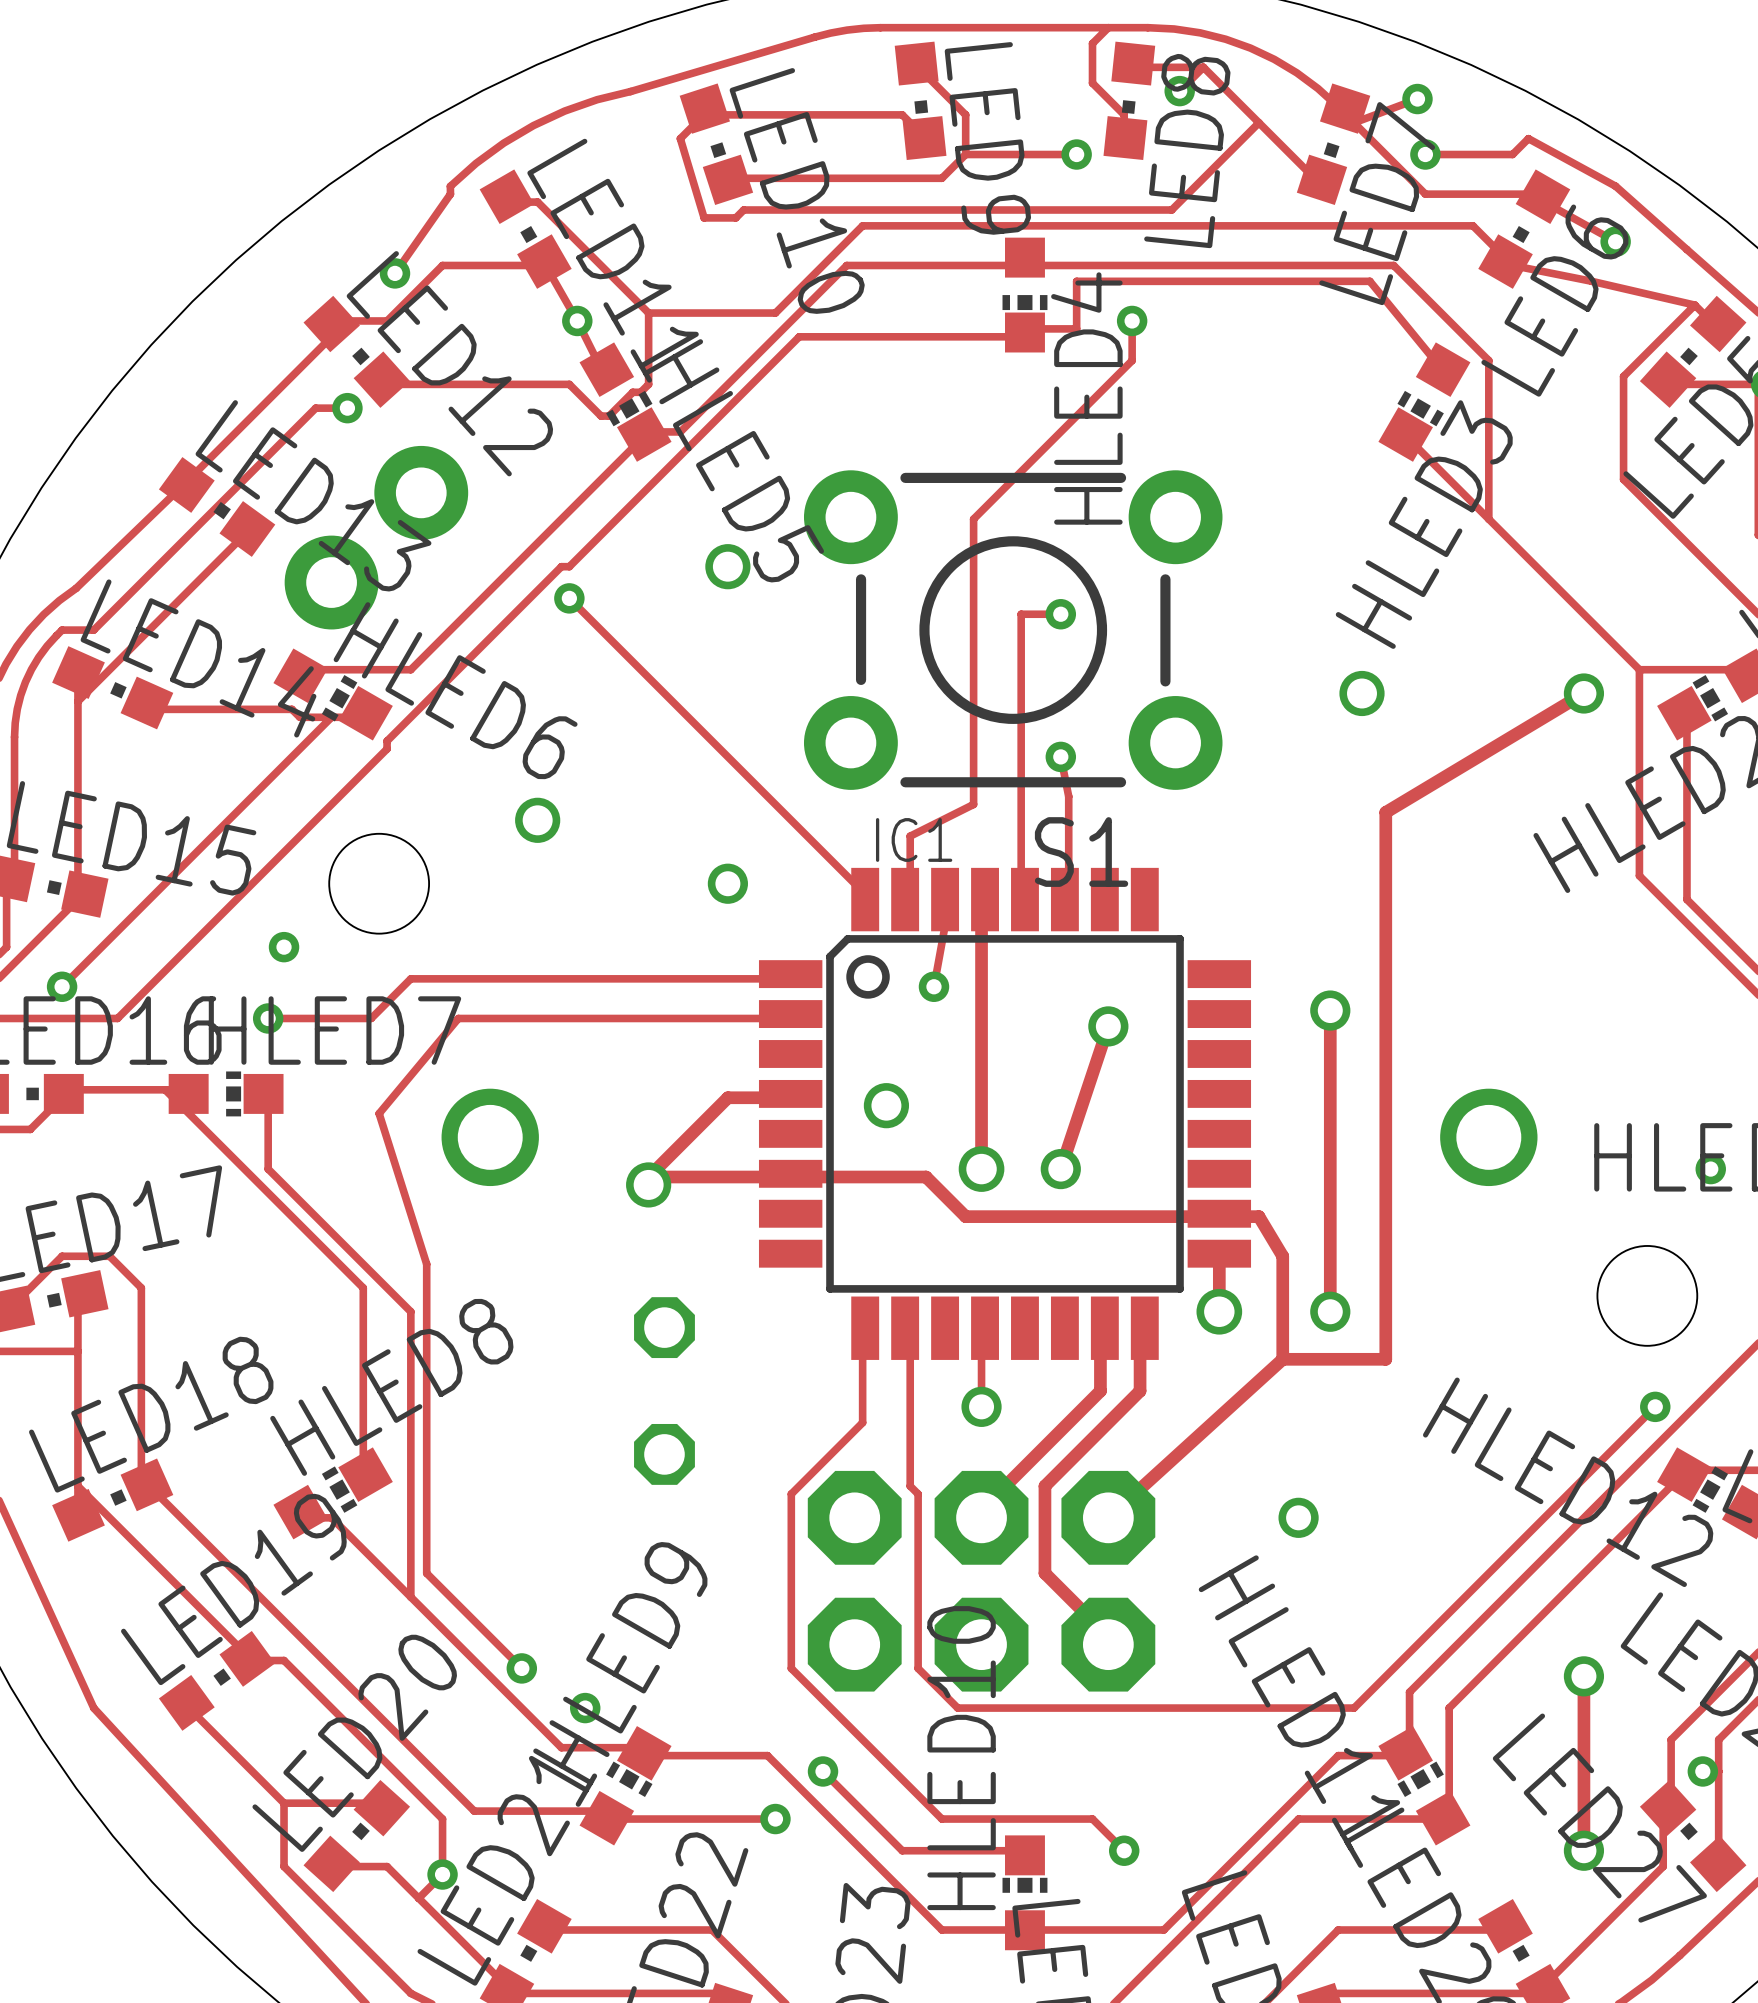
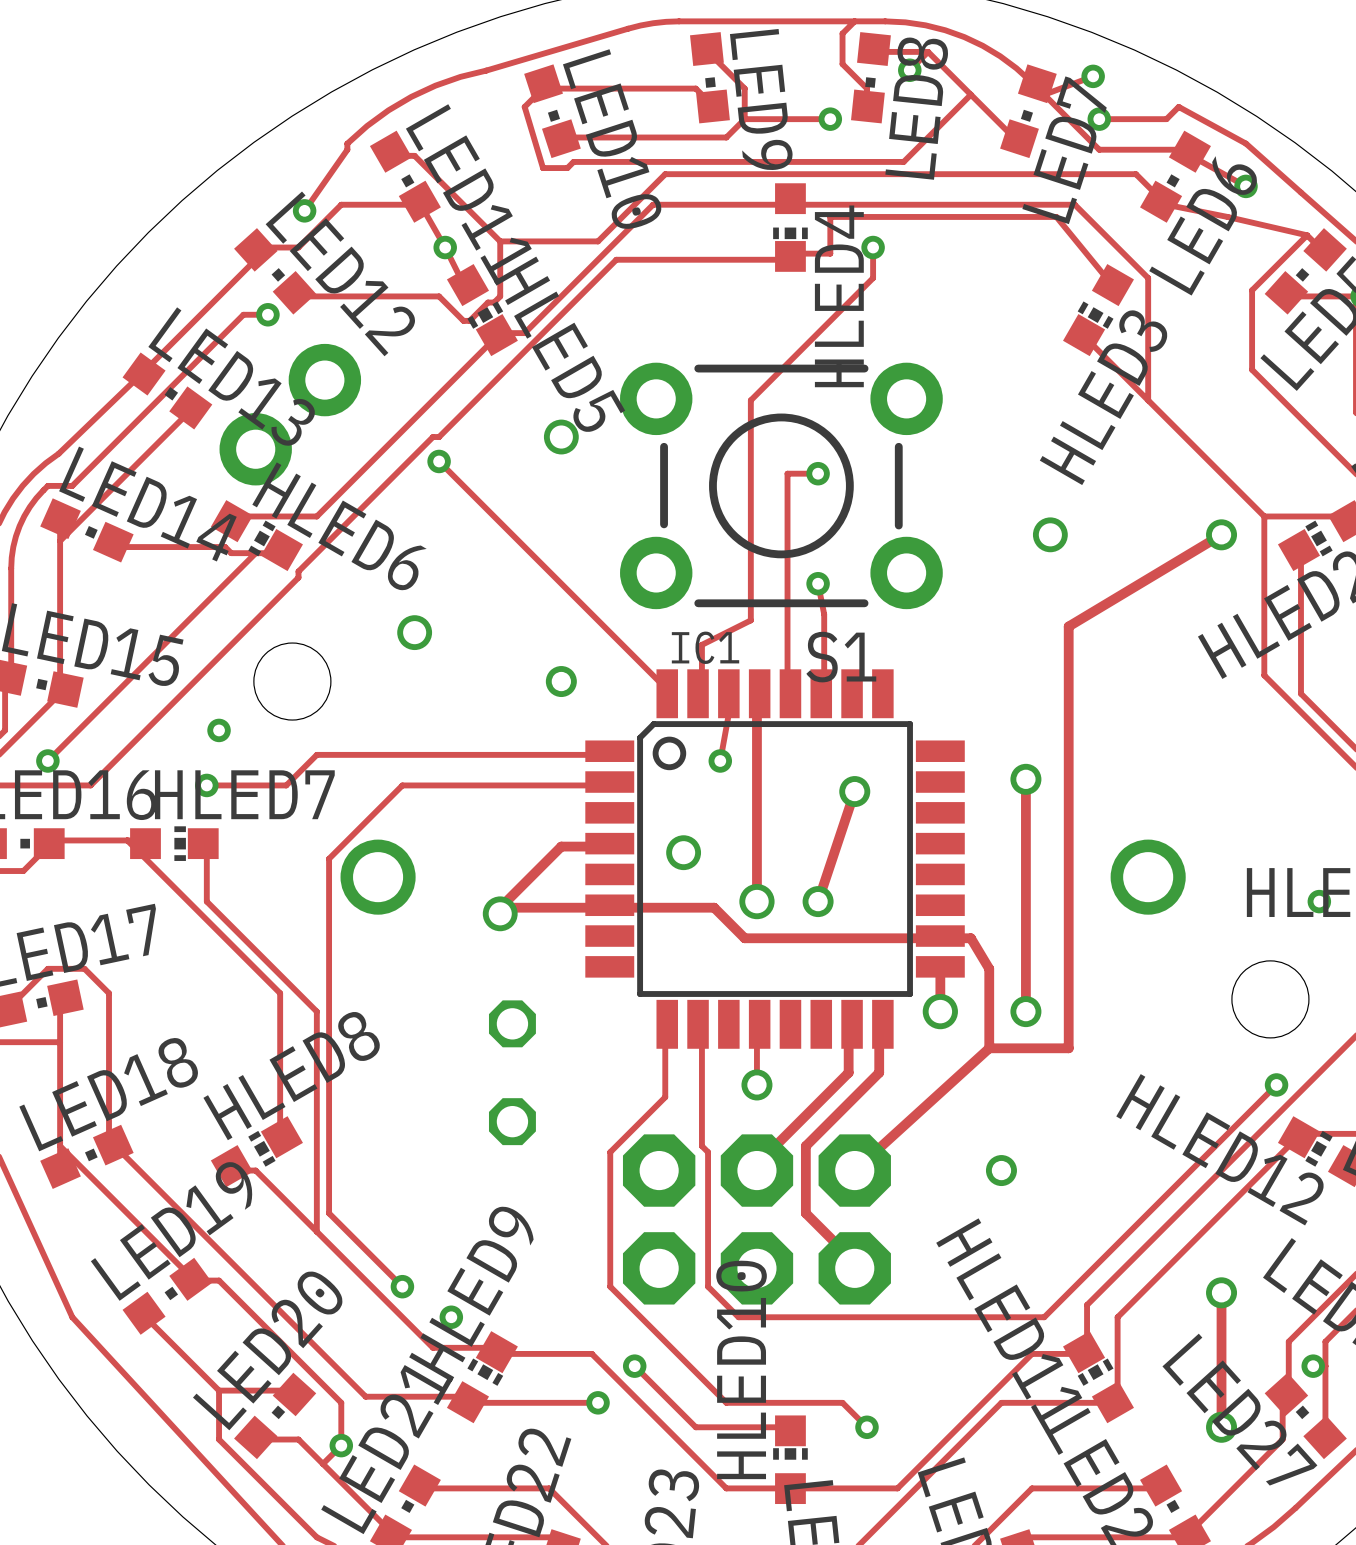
track: (521, 1018) (458, 1018) (379, 1113) (426, 1264) -> (402, 785) (329, 858) (329, 974)

